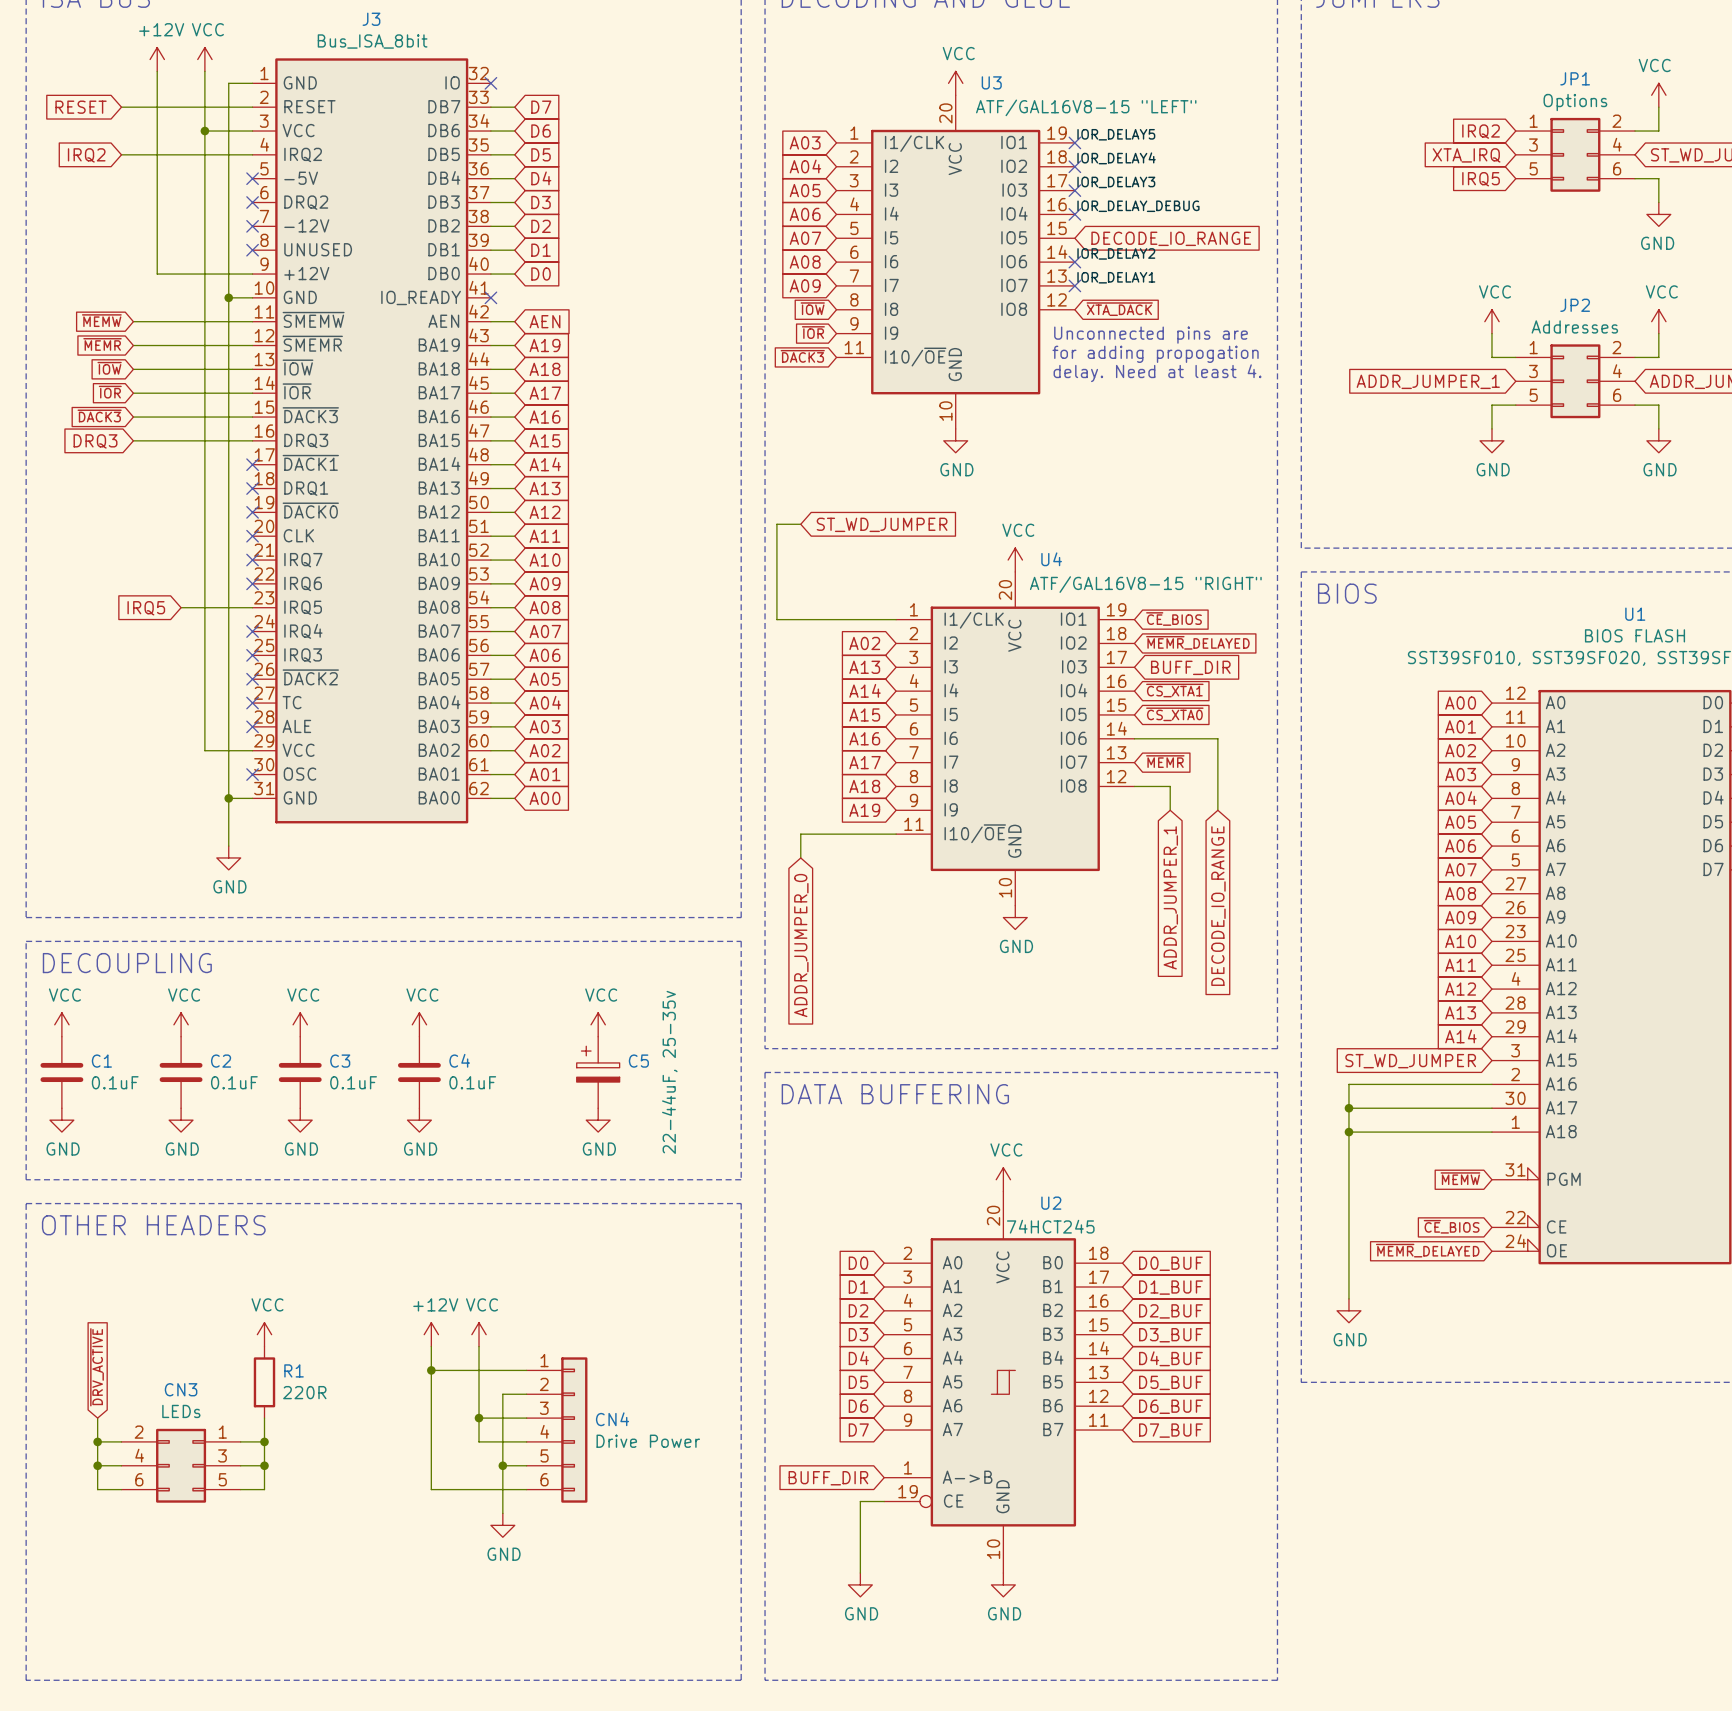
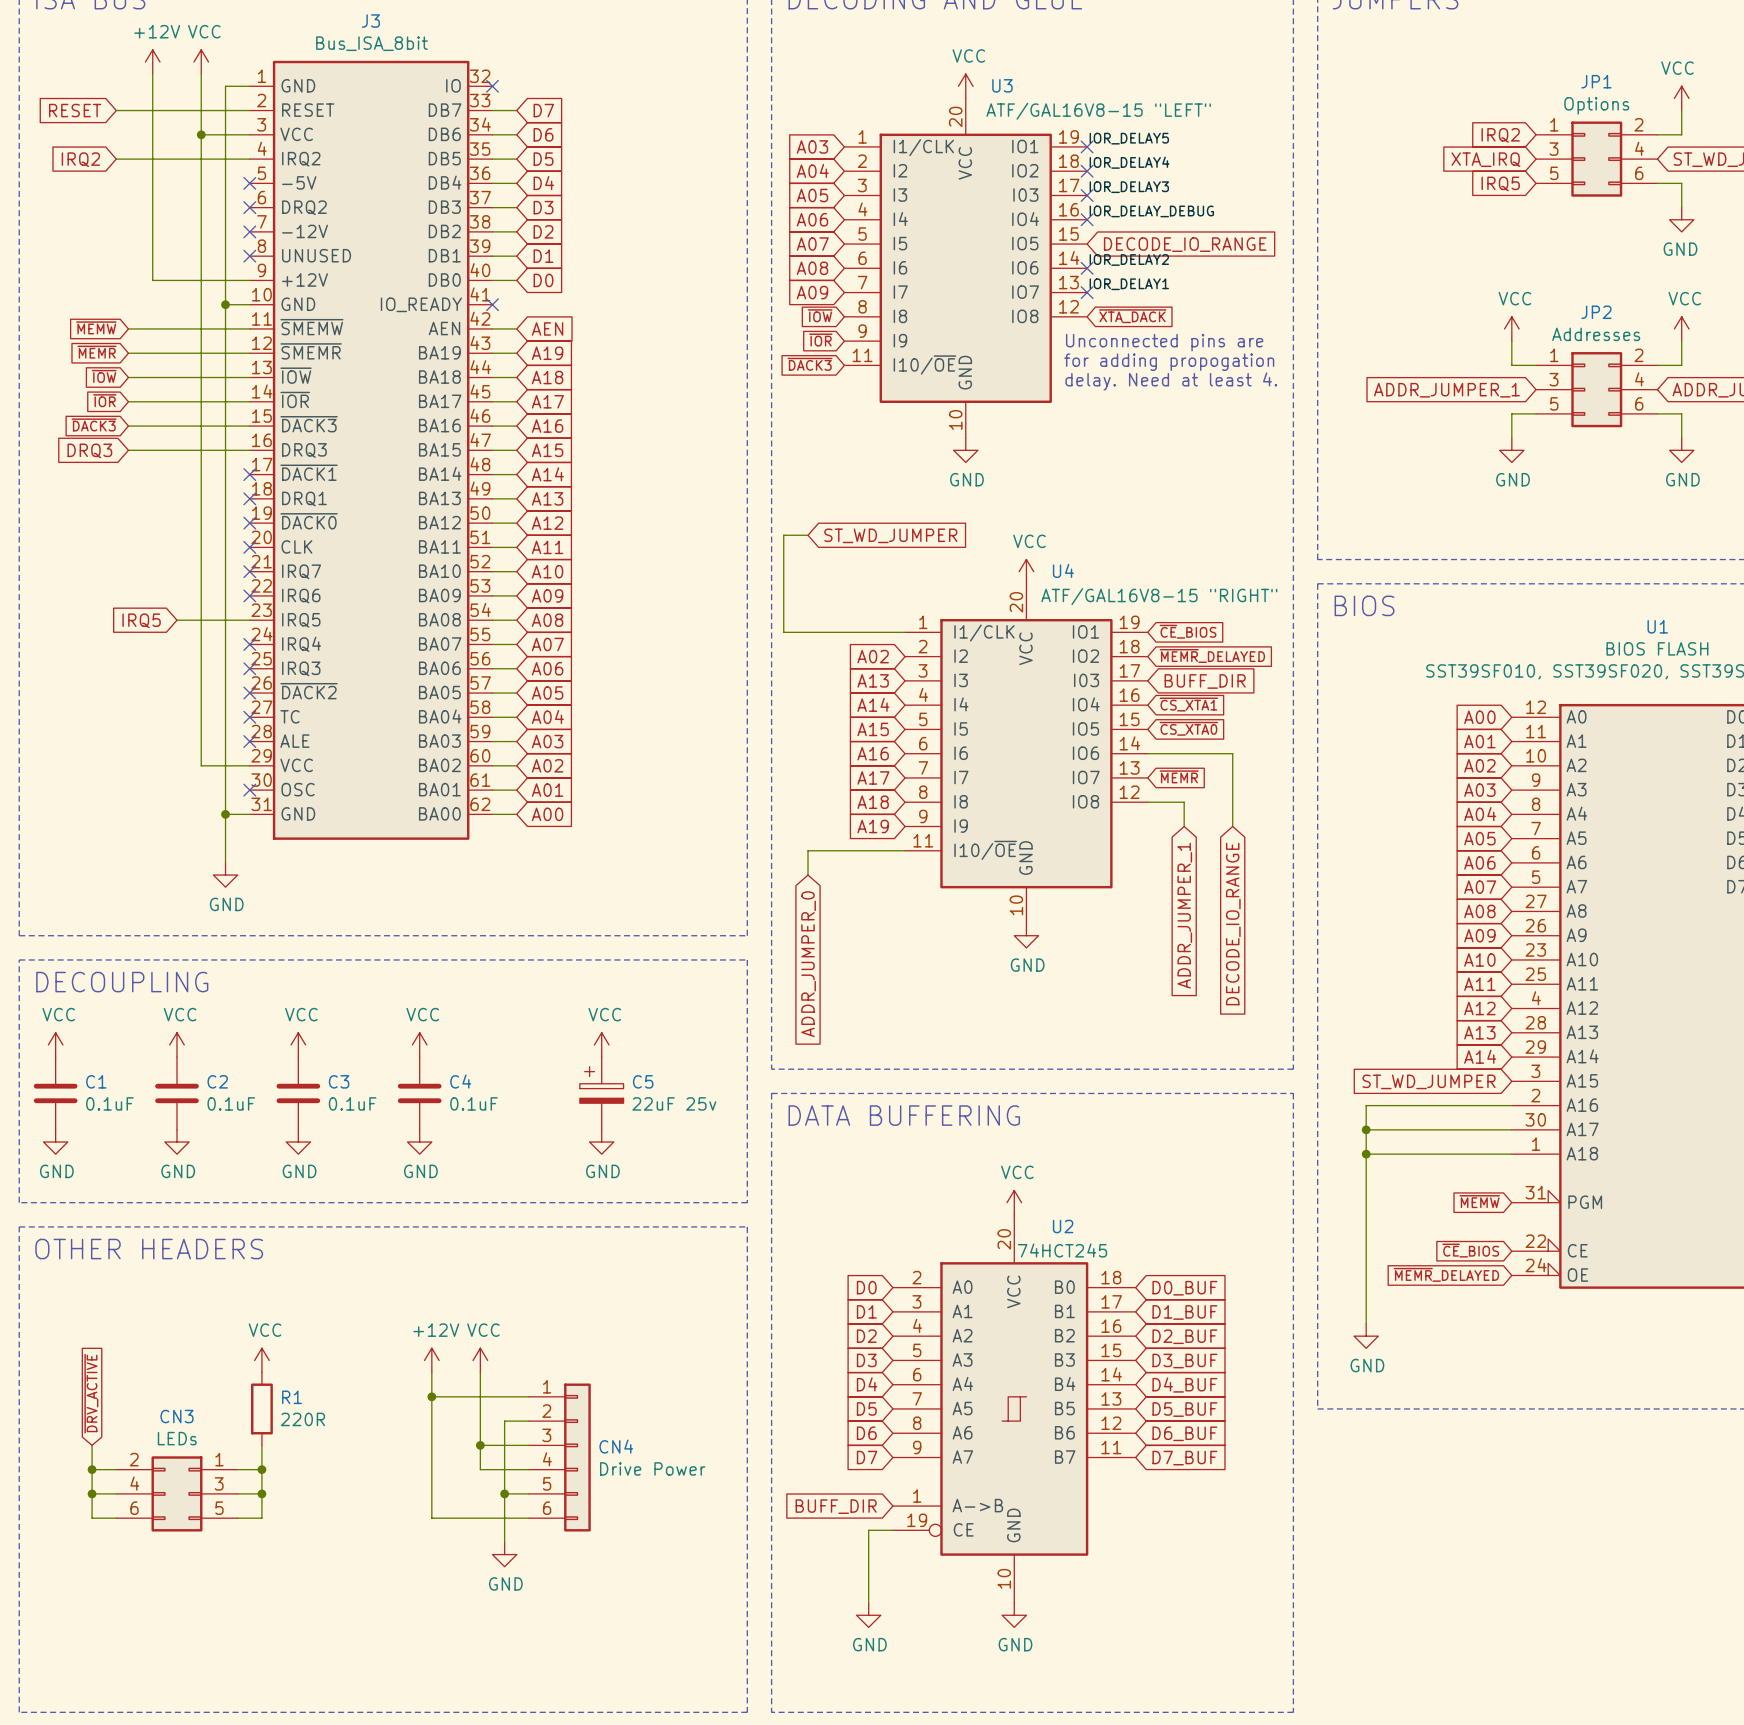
C5 value: 22-44uF, 25-35v (669, 1072) -> 22uF 25v (674, 1103)

